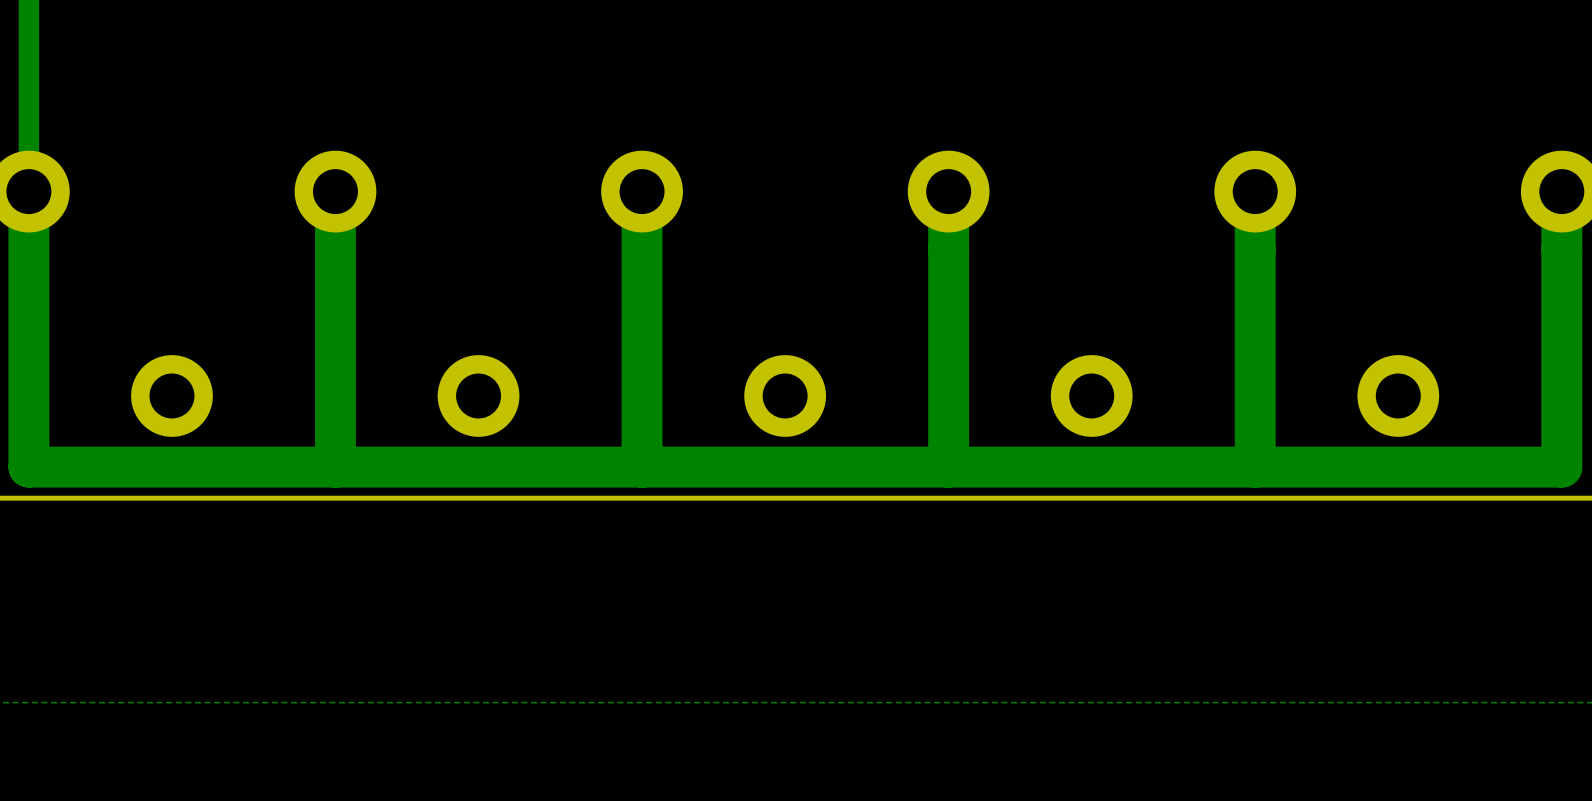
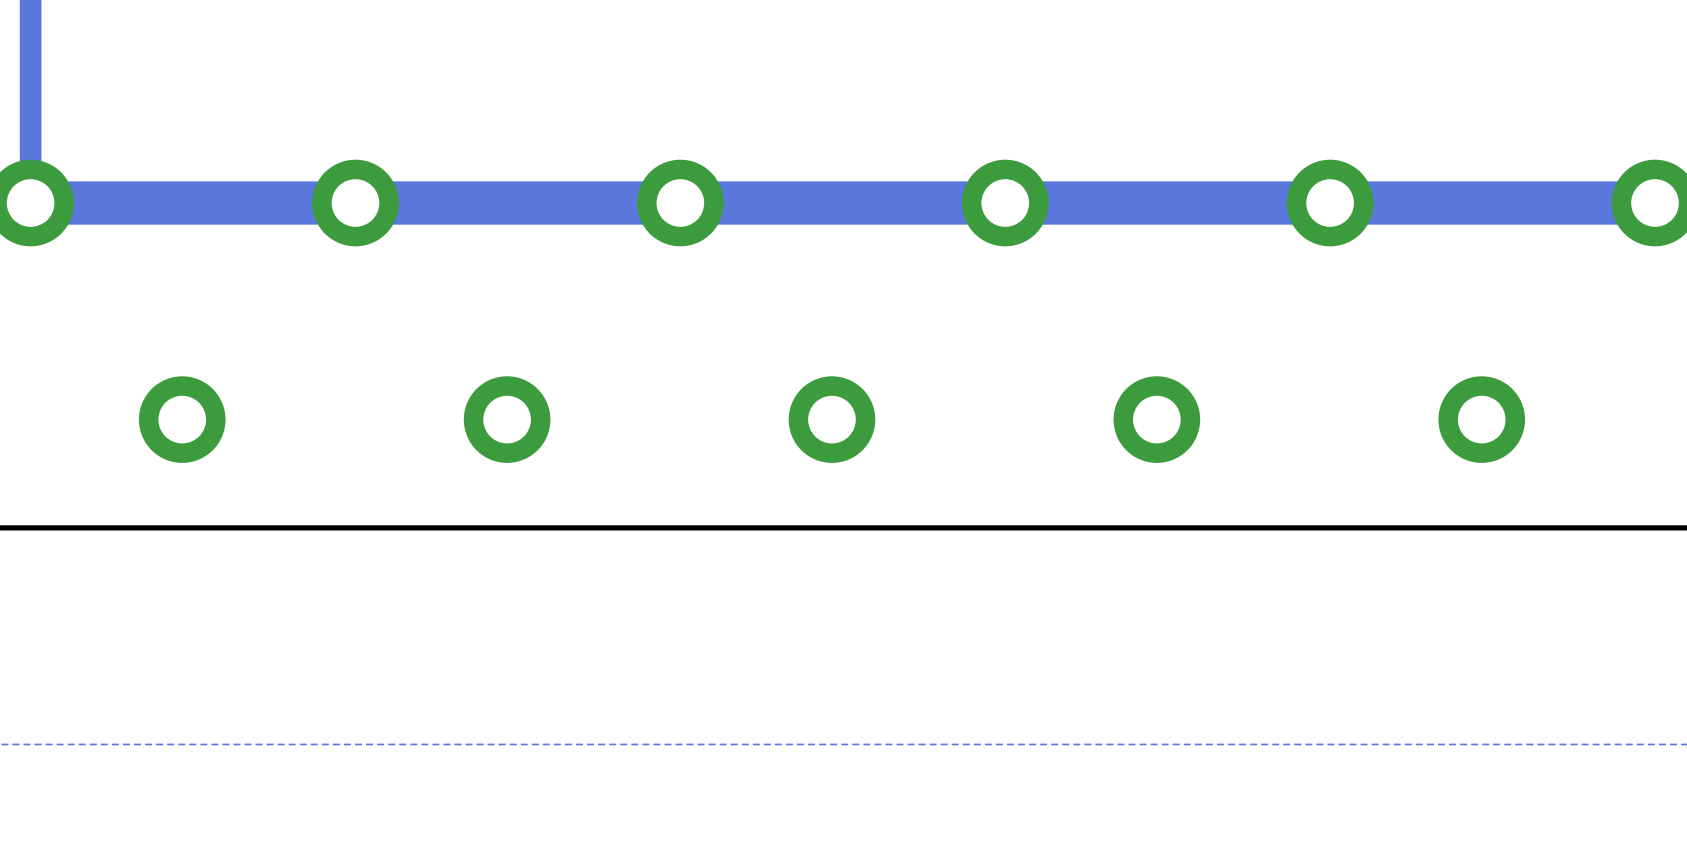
track: (335, 191) (335, 467) -> none
track: (642, 191) (642, 467) -> none
track: (948, 191) (948, 467) -> none
track: (1255, 191) (1255, 467) -> none
track: (1561, 191) (1561, 467) (28, 467) (28, 191) -> (1654, 203) (30, 203)

